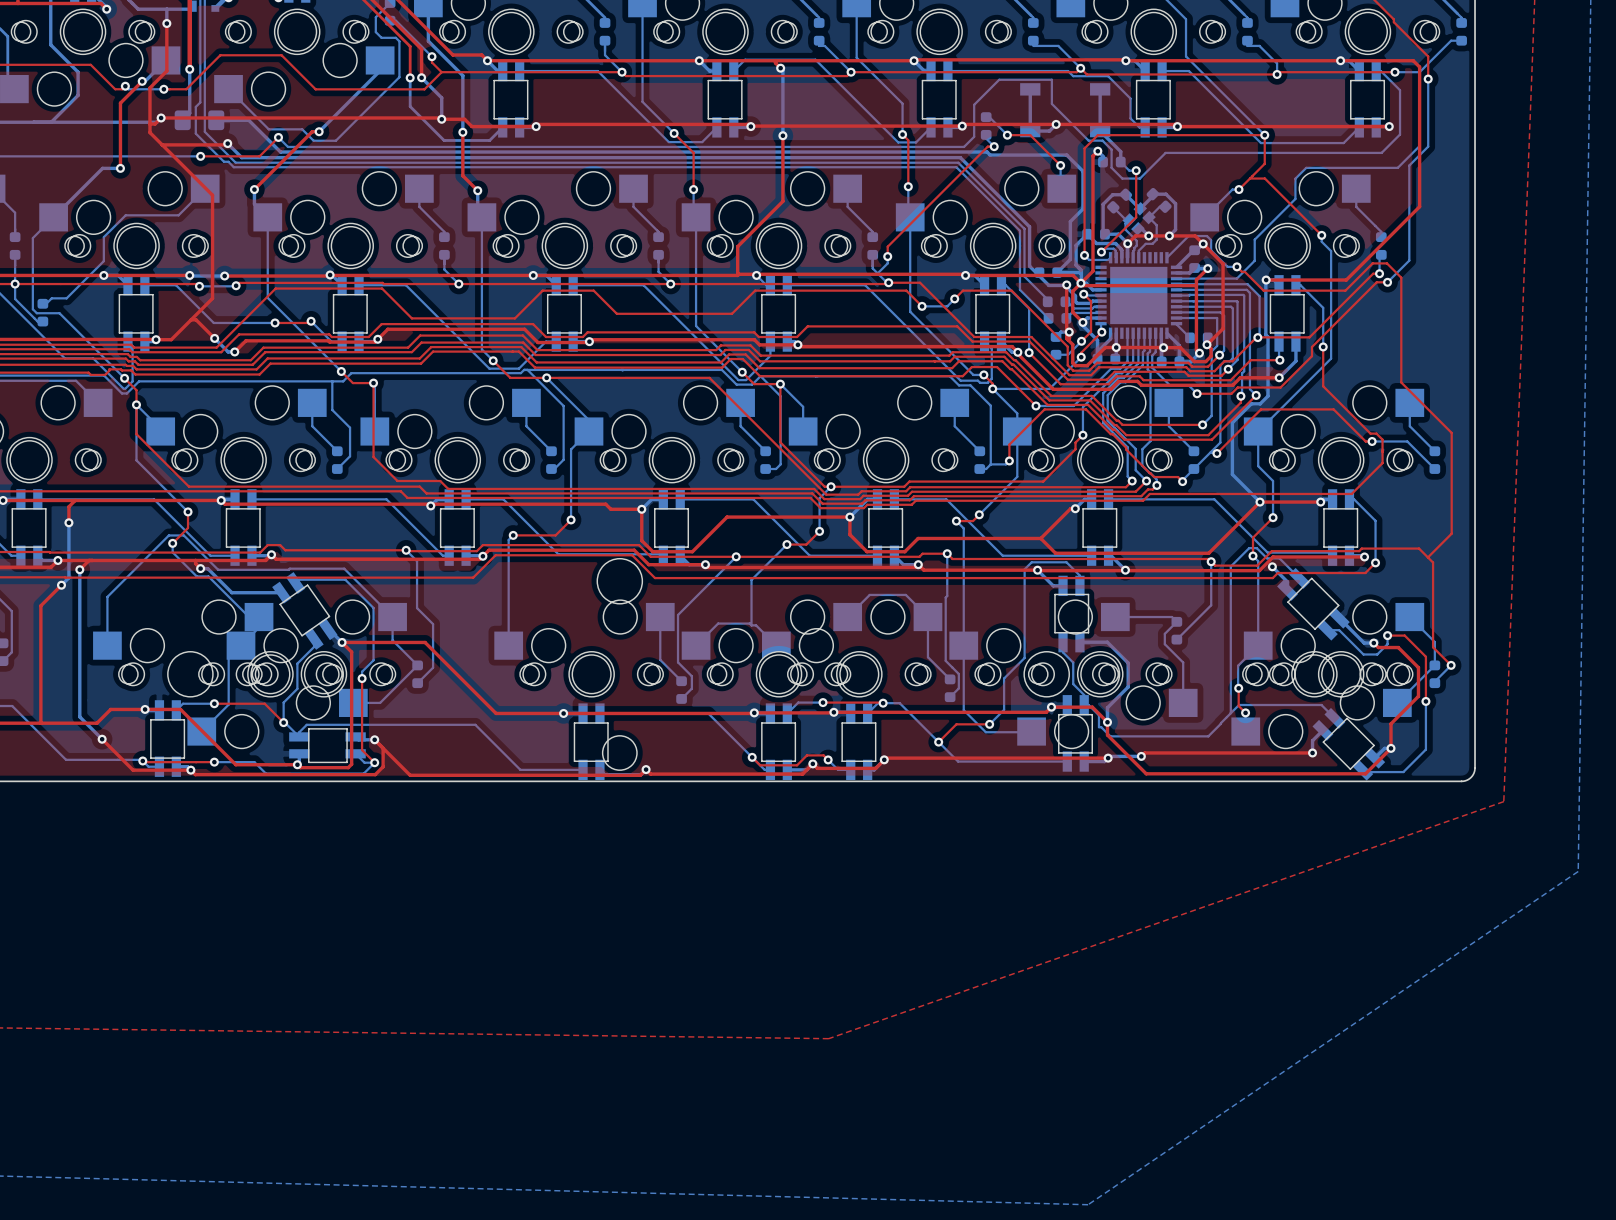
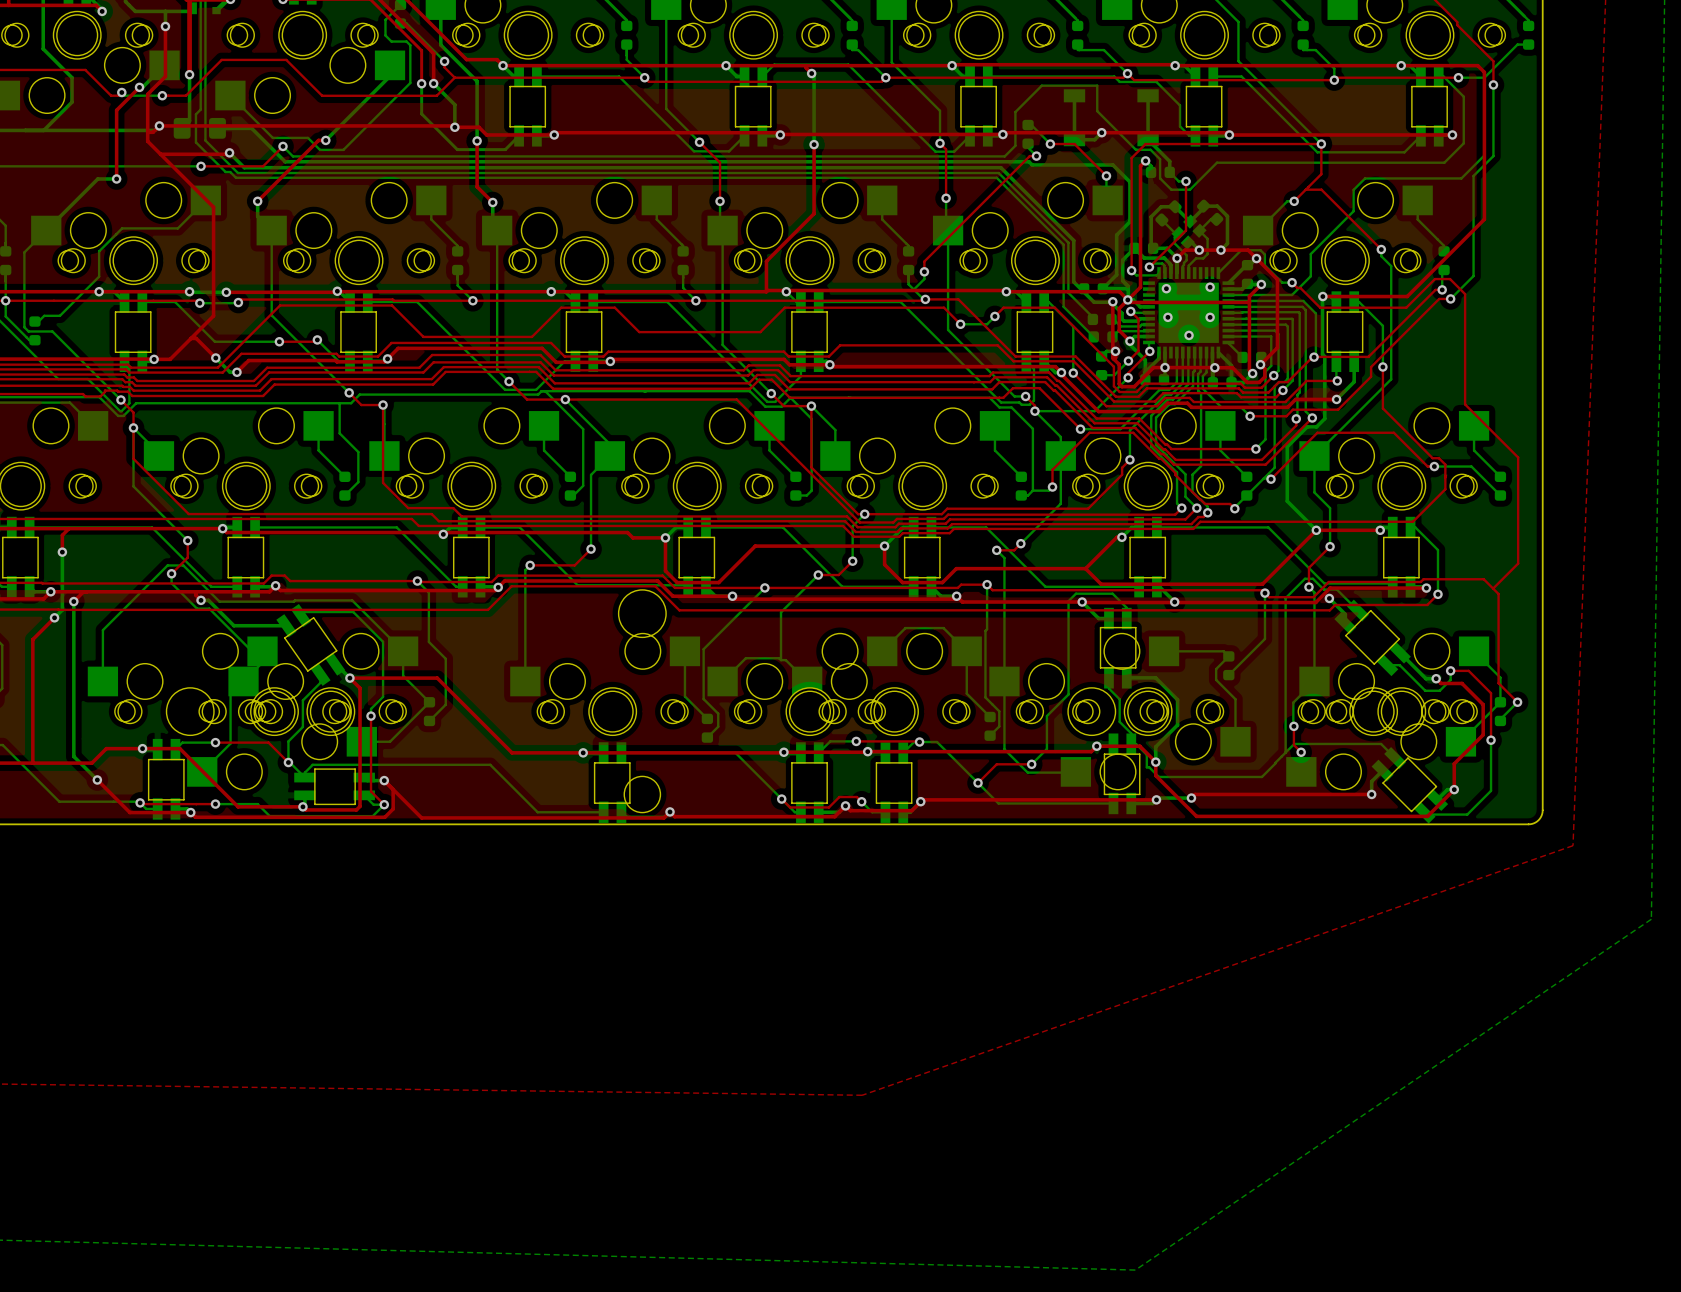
via: none -> (1210, 287)
via: none -> (1166, 288)
via: none -> (1167, 317)
via: none -> (1210, 317)
via: none -> (1189, 335)

